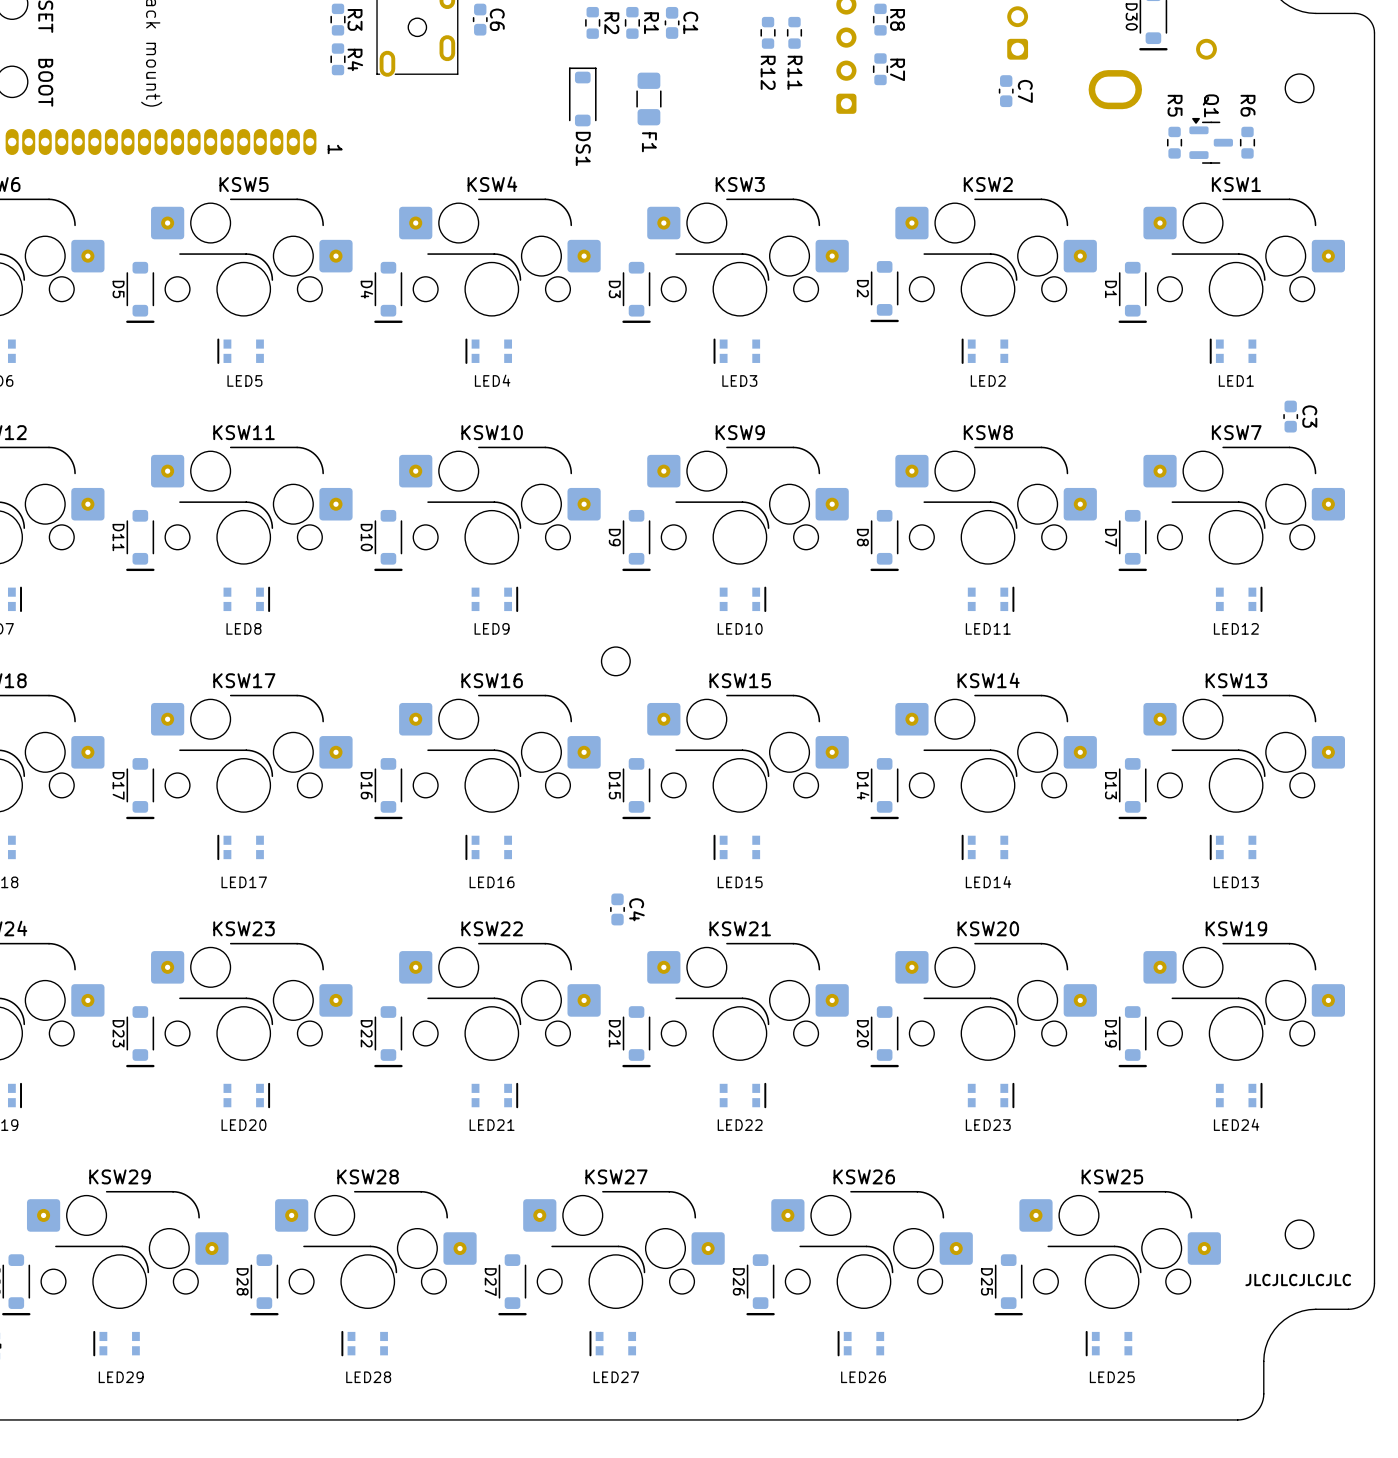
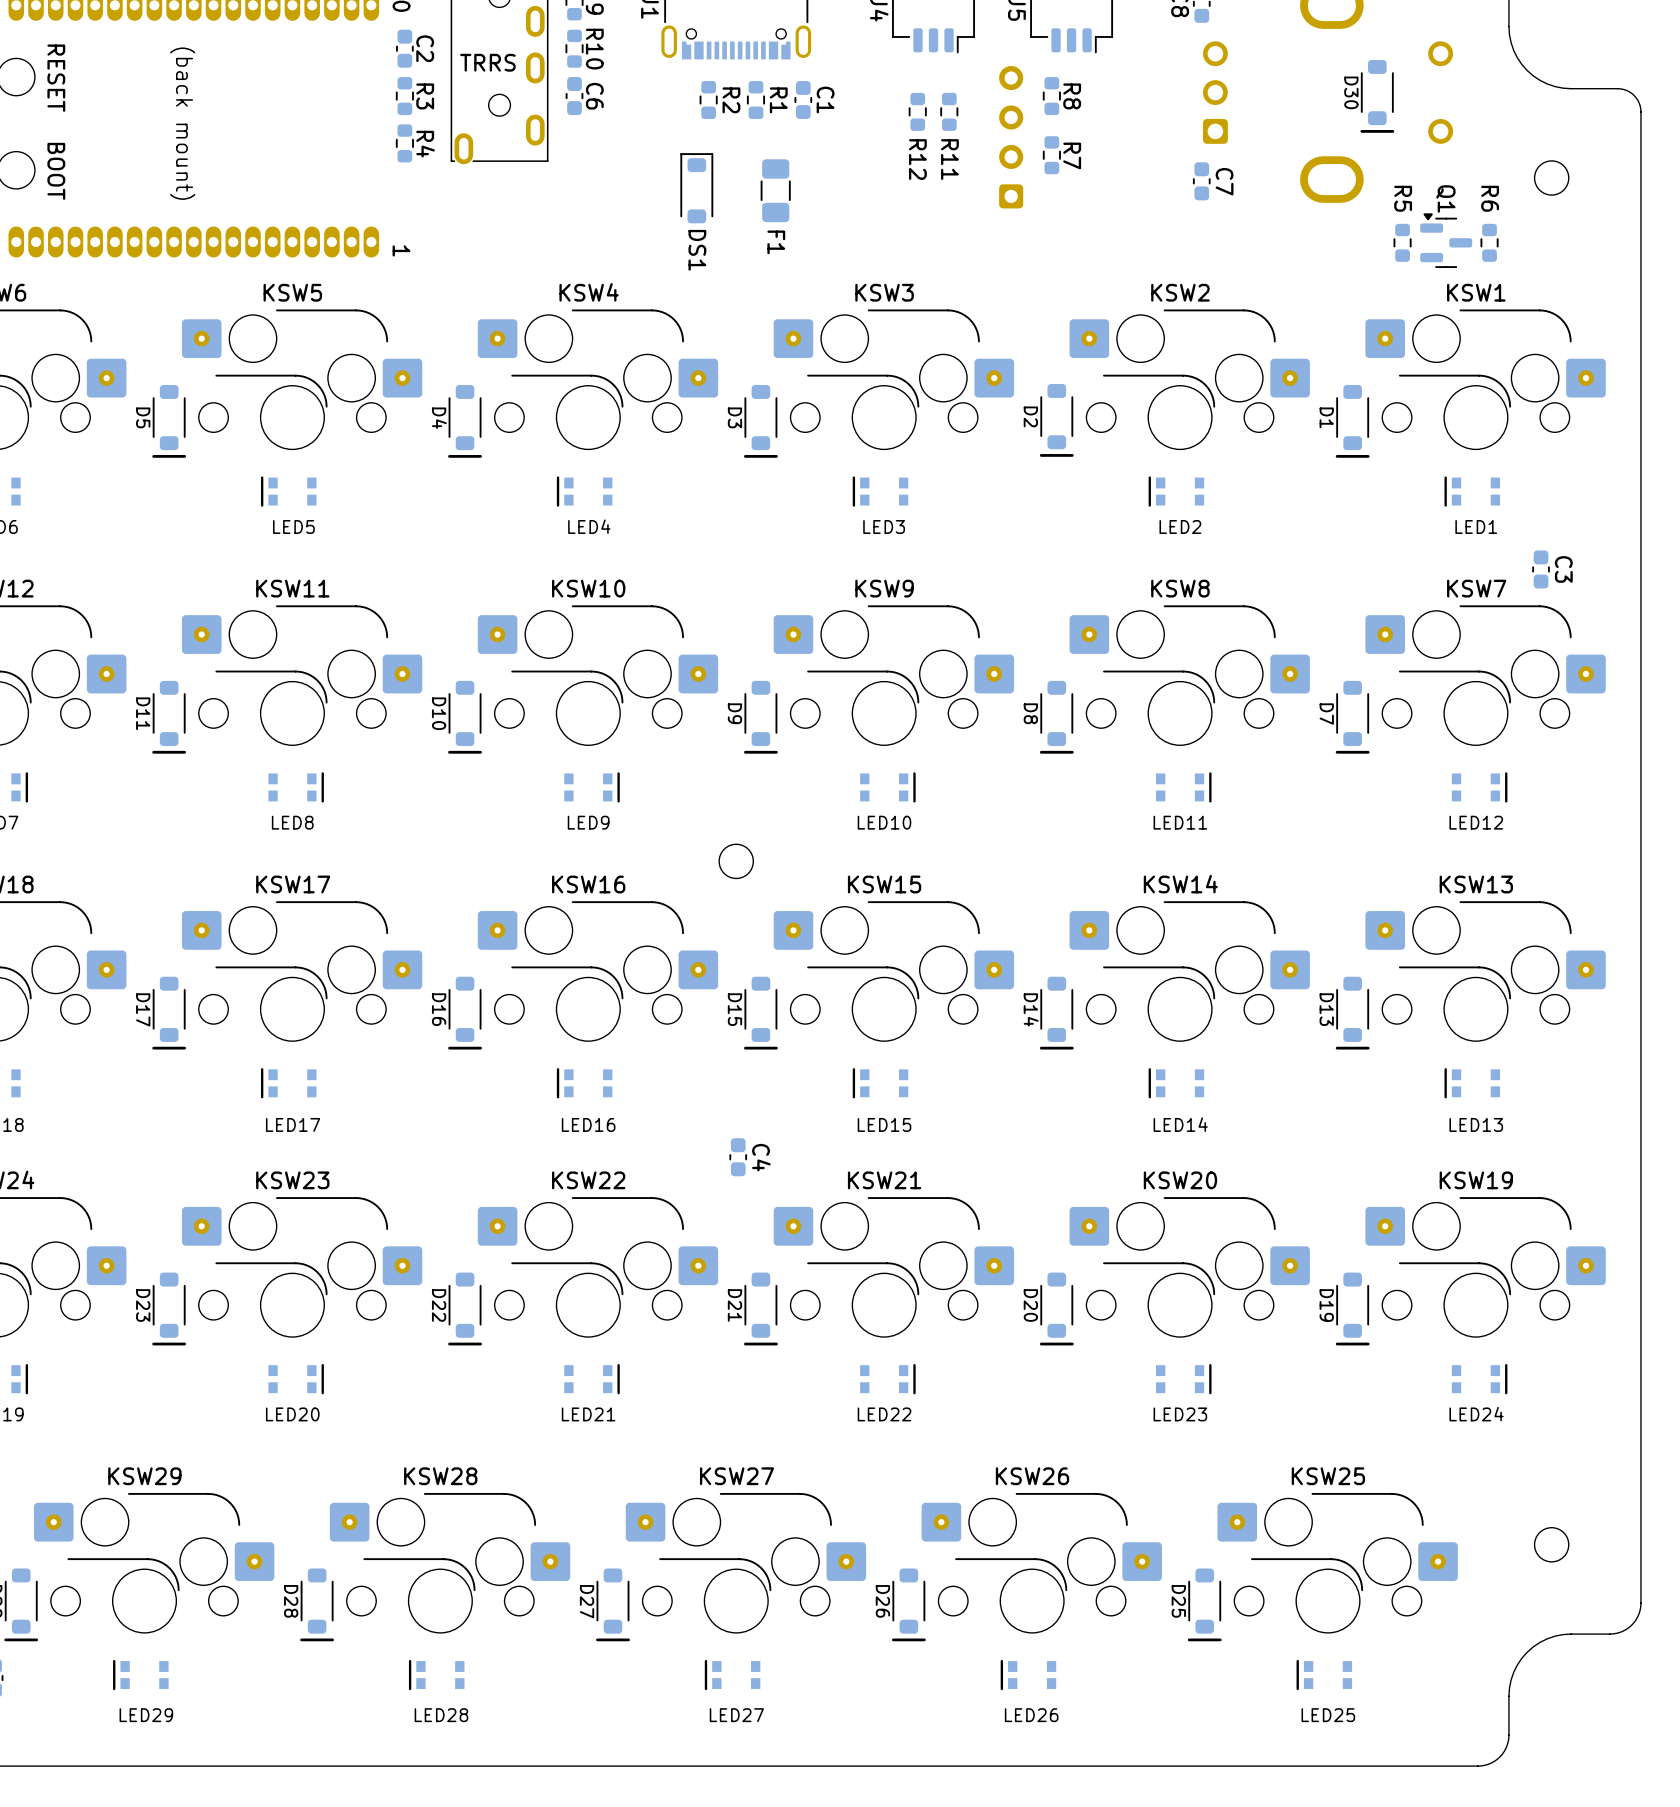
text: JLCJLCJLCJLC (1298, 1280) -> none

